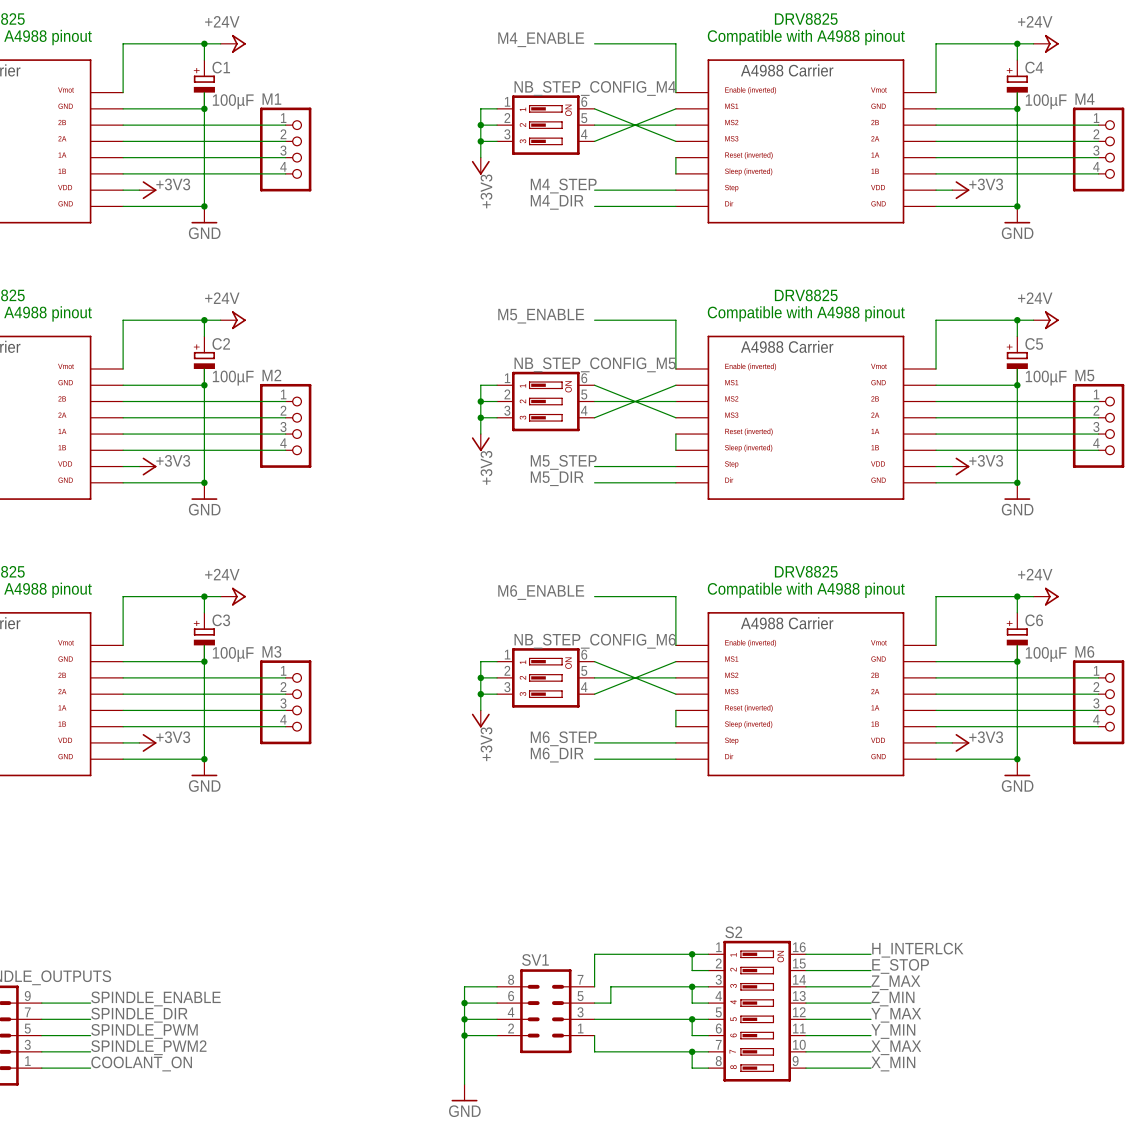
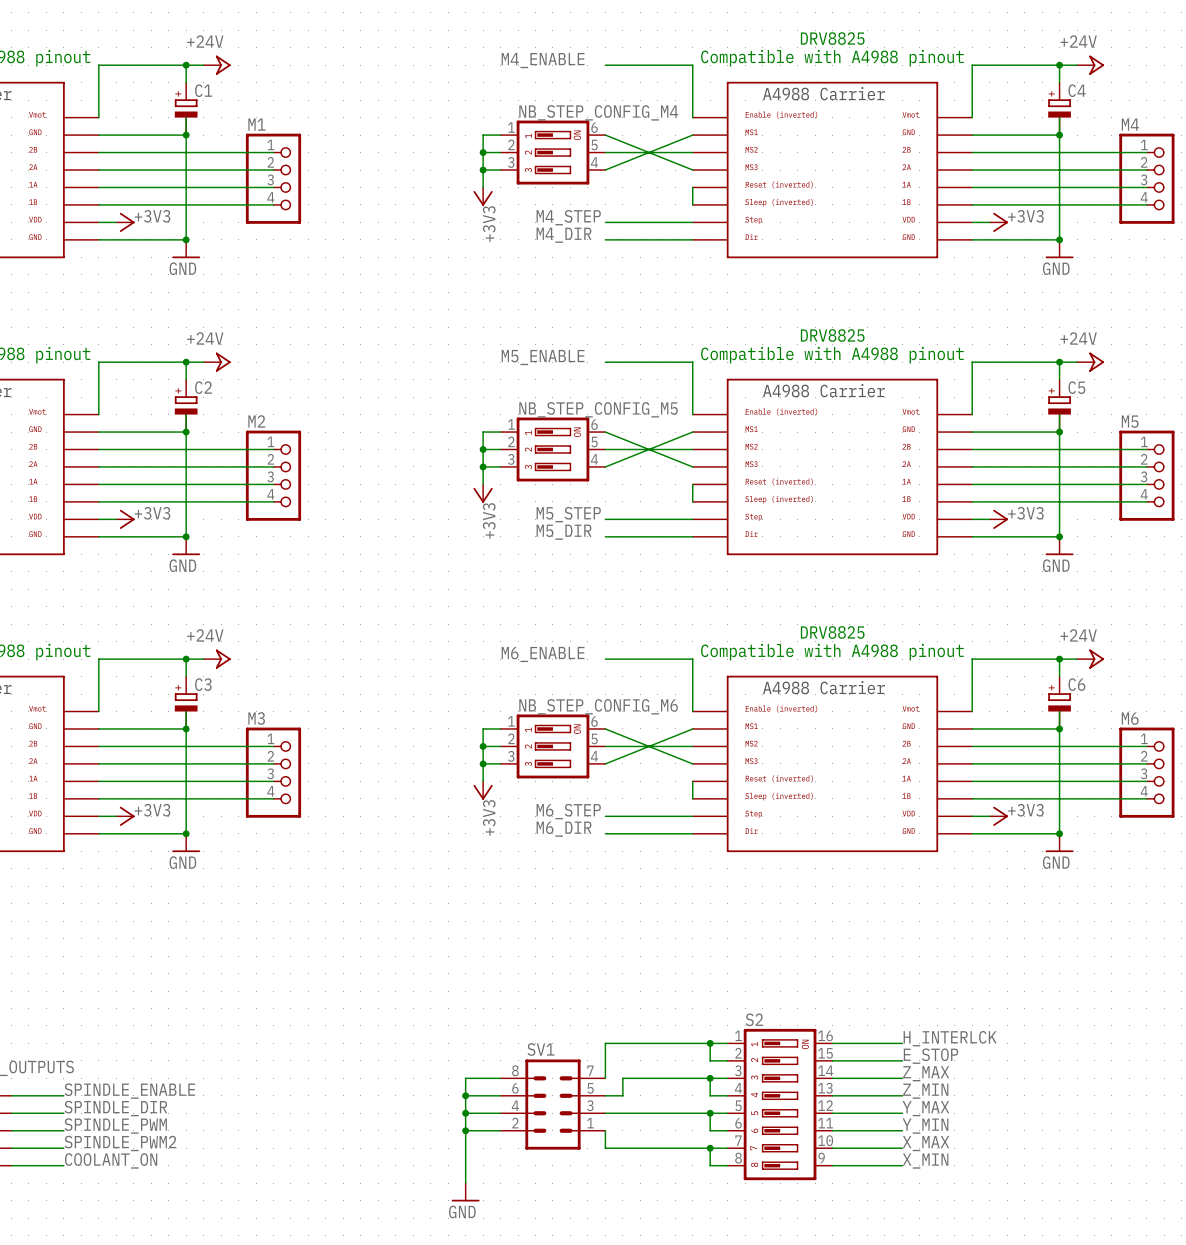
C1 value: 100µF (233, 101) -> none
C4 value: 100µF (1046, 101) -> none
C2 value: 100µF (233, 378) -> none
C5 value: 100µF (1046, 378) -> none
C3 value: 100µF (233, 654) -> none
C6 value: 100µF (1046, 654) -> none

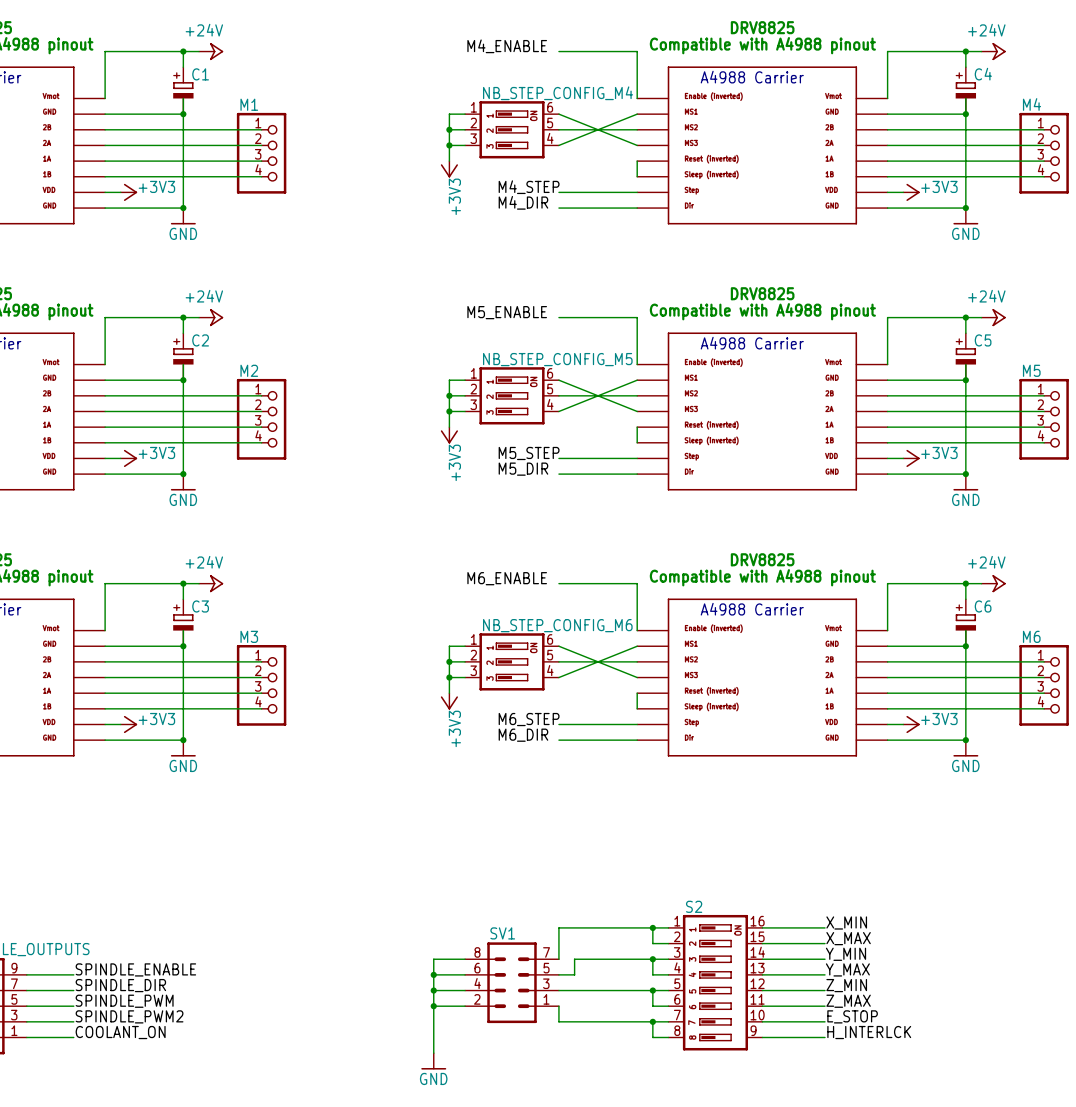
label: H_INTERLCK (950, 1038) -> X_MIN (846, 922)
label: E_STOP (930, 1056) -> X_MAX (848, 938)
label: Z_MAX (926, 1073) -> Y_MIN (846, 954)
label: Z_MIN (925, 1091) -> Y_MAX (847, 969)
label: Y_MAX (925, 1108) -> Z_MIN (846, 985)
label: Y_MIN (925, 1126) -> Z_MAX (848, 1001)
label: X_MAX (926, 1143) -> E_STOP (852, 1016)
label: X_MIN (925, 1161) -> H_INTERLCK (869, 1032)

